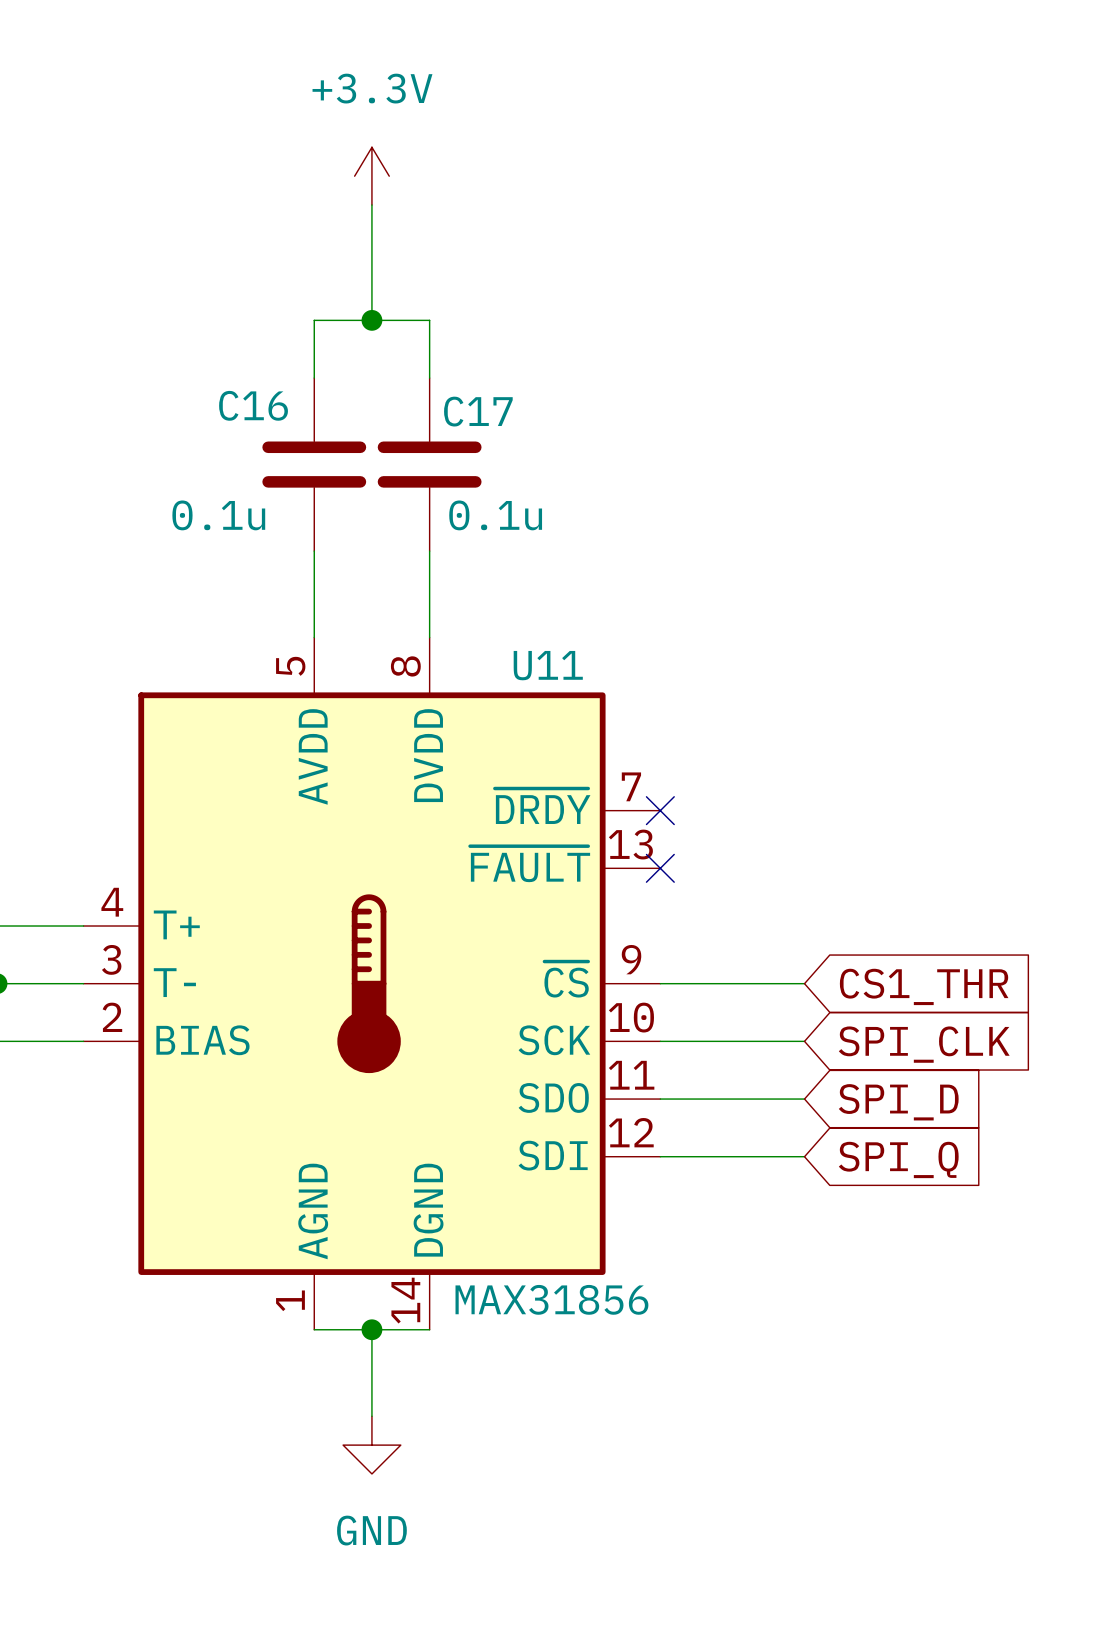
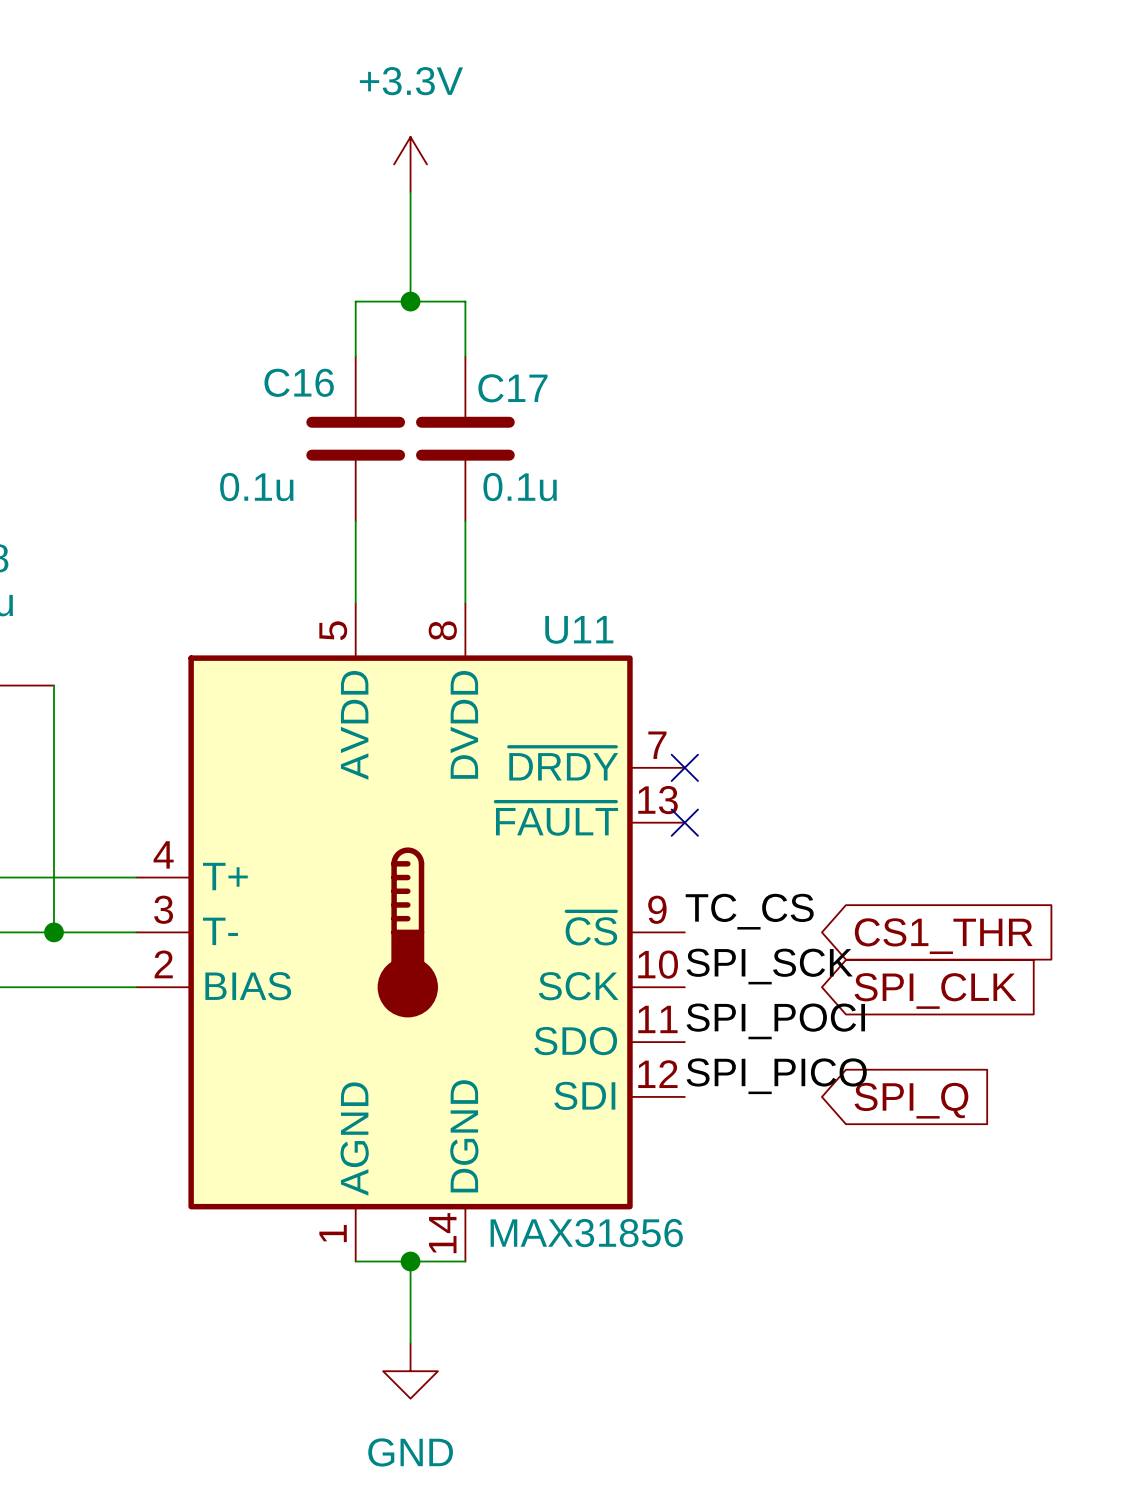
label: none -> TC_CS (749, 911)
wire: (660, 983) (804, 983) -> none
label: none -> SPI_SCK (769, 966)
wire: (660, 1041) (804, 1041) -> none
label: none -> SPI_POCI (775, 1021)
wire: (660, 1099) (804, 1099) -> none
global label: SPI_D (898, 1102) -> none
label: none -> SPI_PICO (776, 1076)
wire: (660, 1156) (804, 1156) -> none

